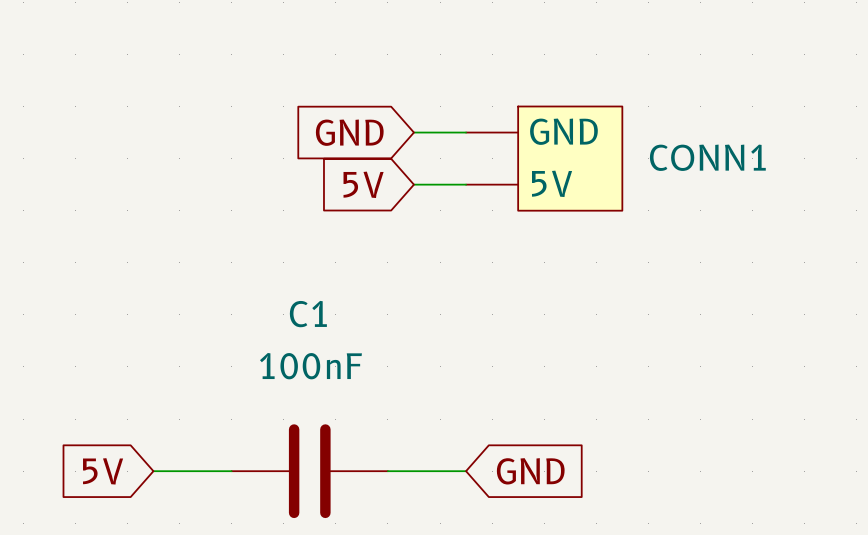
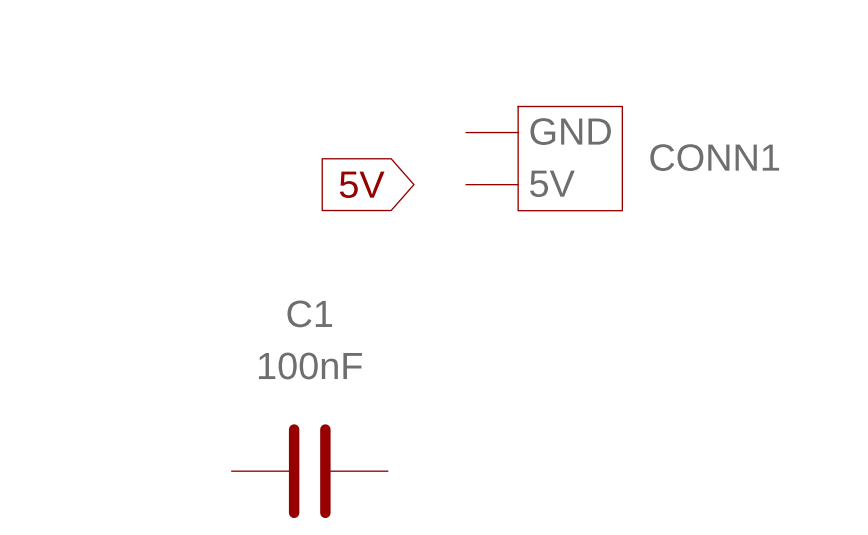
global label: GND (349, 132) -> none
wire: (413, 132) (466, 132) -> none
wire: (413, 184) (466, 184) -> none
global label: 5V (103, 471) -> none
wire: (153, 471) (231, 471) -> none
wire: (387, 471) (466, 471) -> none
global label: GND (530, 471) -> none

